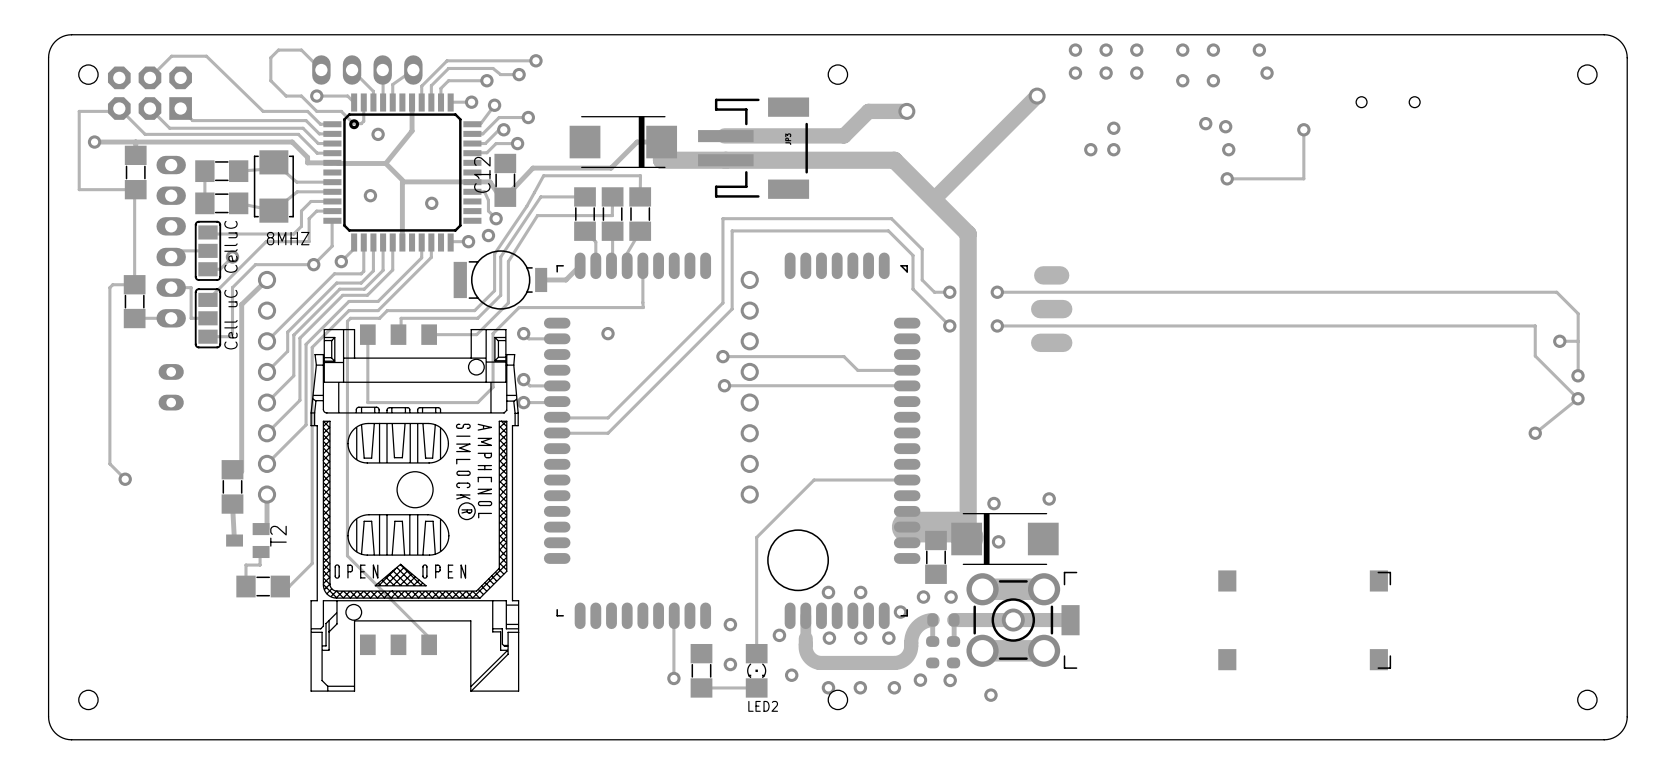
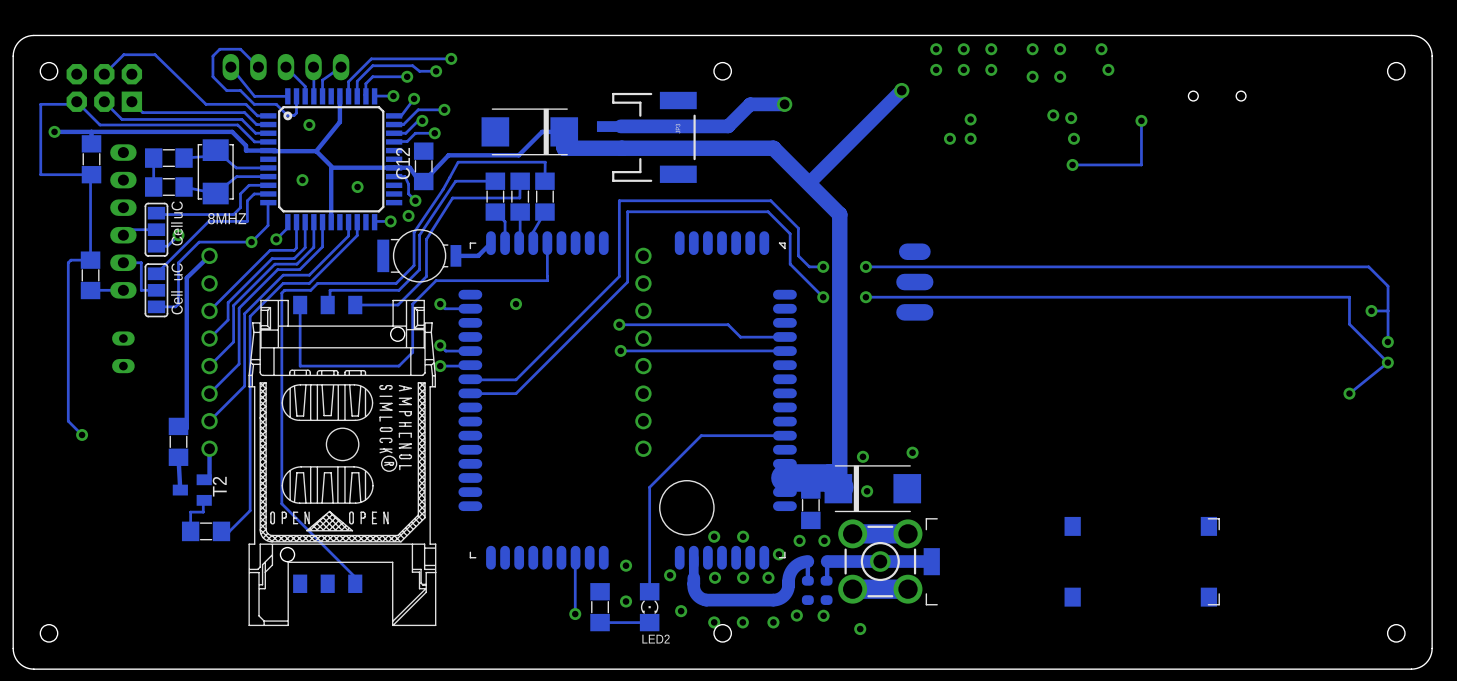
part: none -> (285, 67)
track: (316, 96) (347, 96) (354, 102) -> (230, 67) (254, 96) (287, 96)
via: (316, 96) -> none

